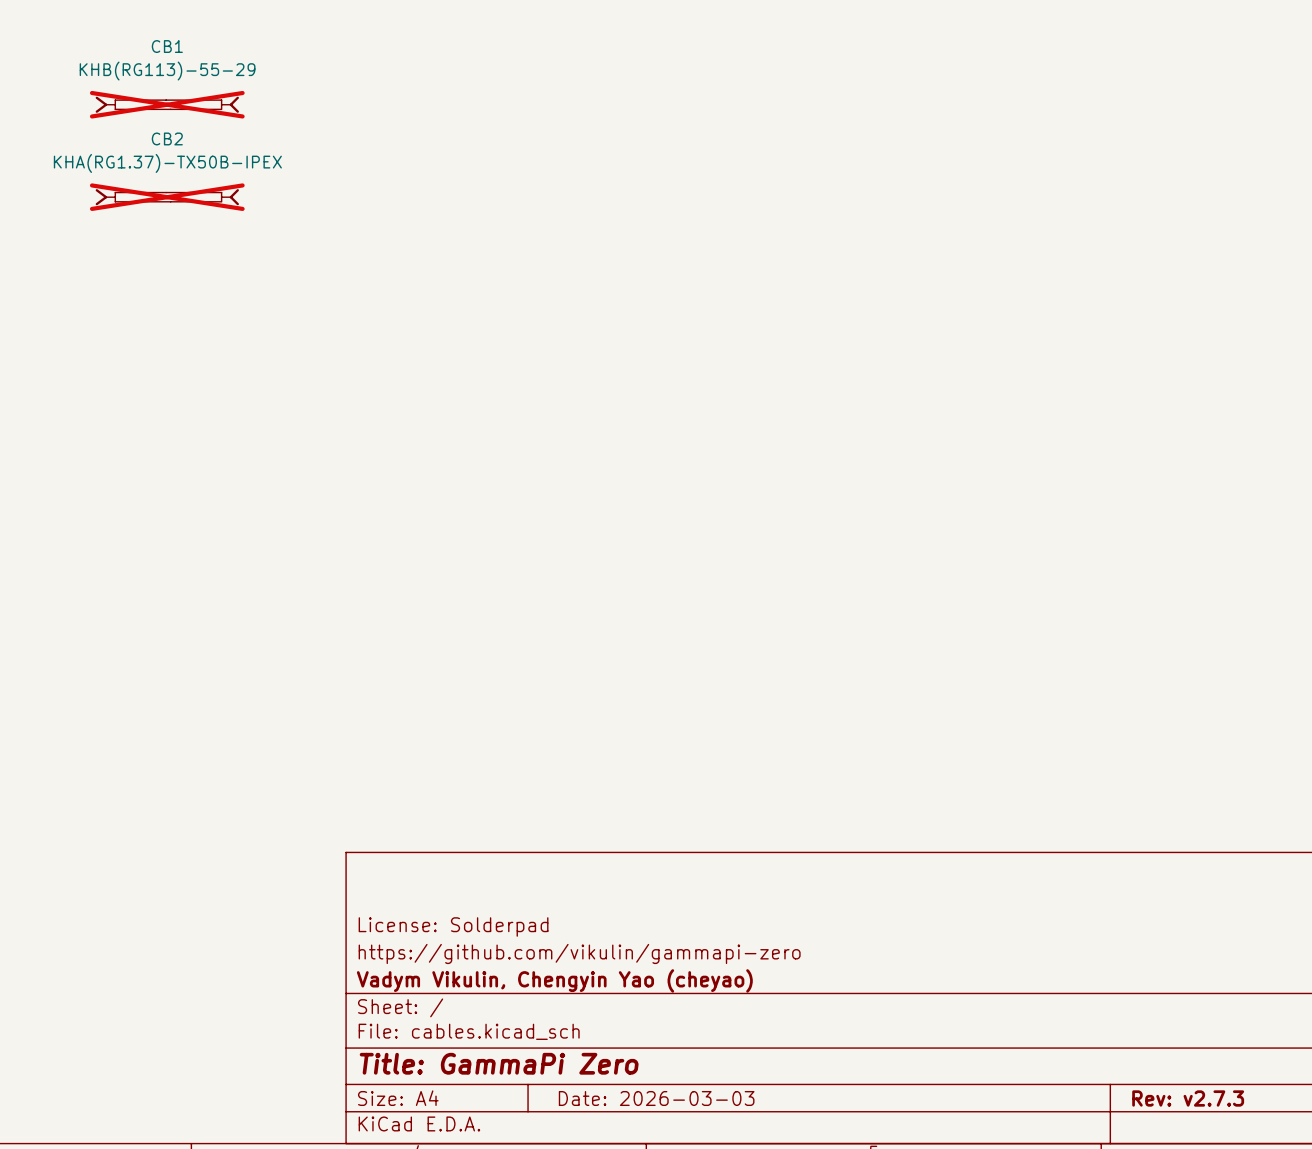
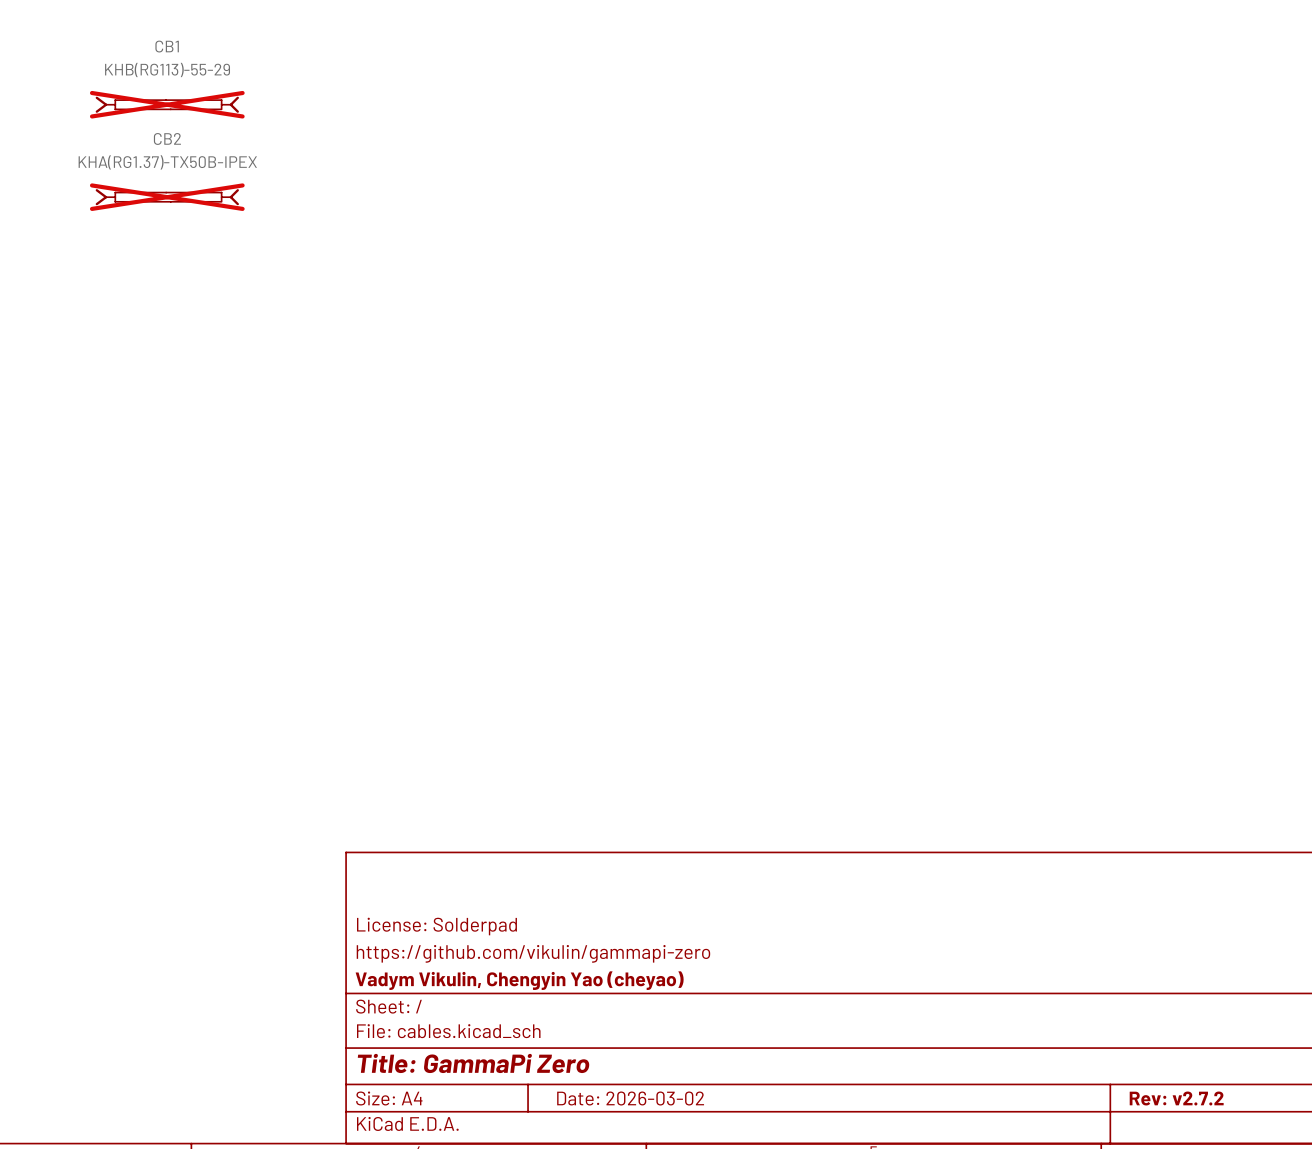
title block: Date: 2026-03-03 (656, 1098) -> Date: 2026-03-02 (630, 1098)
title block: Rev: v2.7.3 (1188, 1098) -> Rev: v2.7.2 (1176, 1098)

